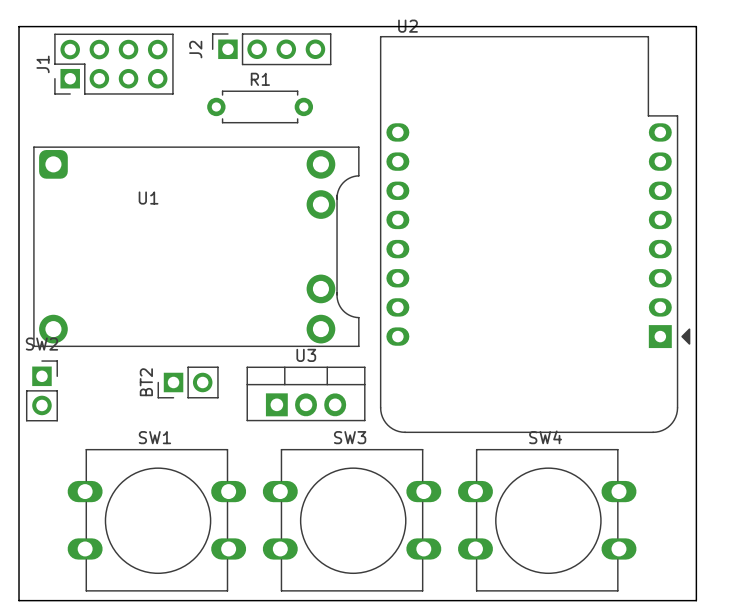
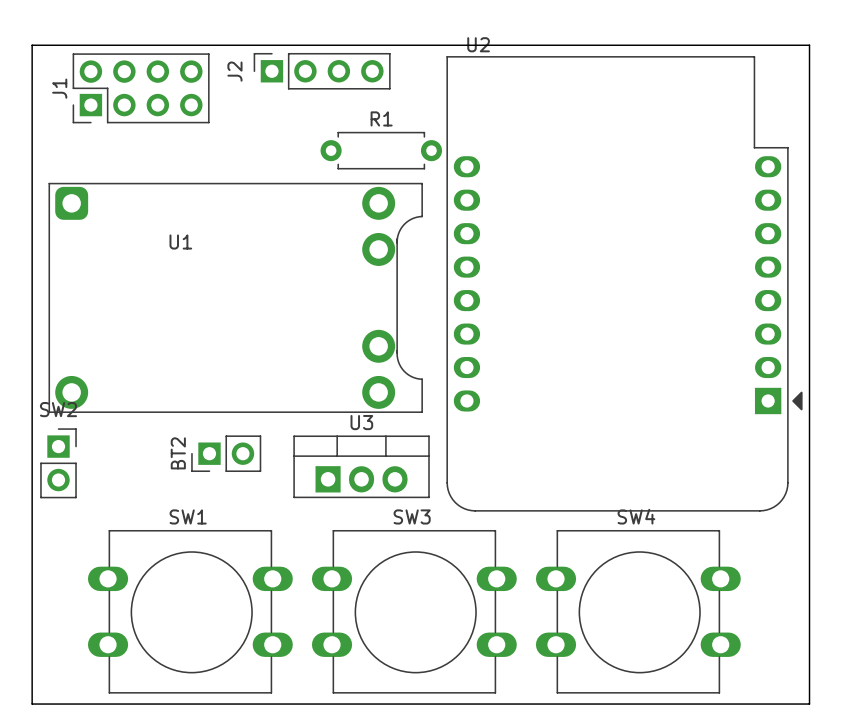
R1 position: (260, 106) -> (381, 150)

